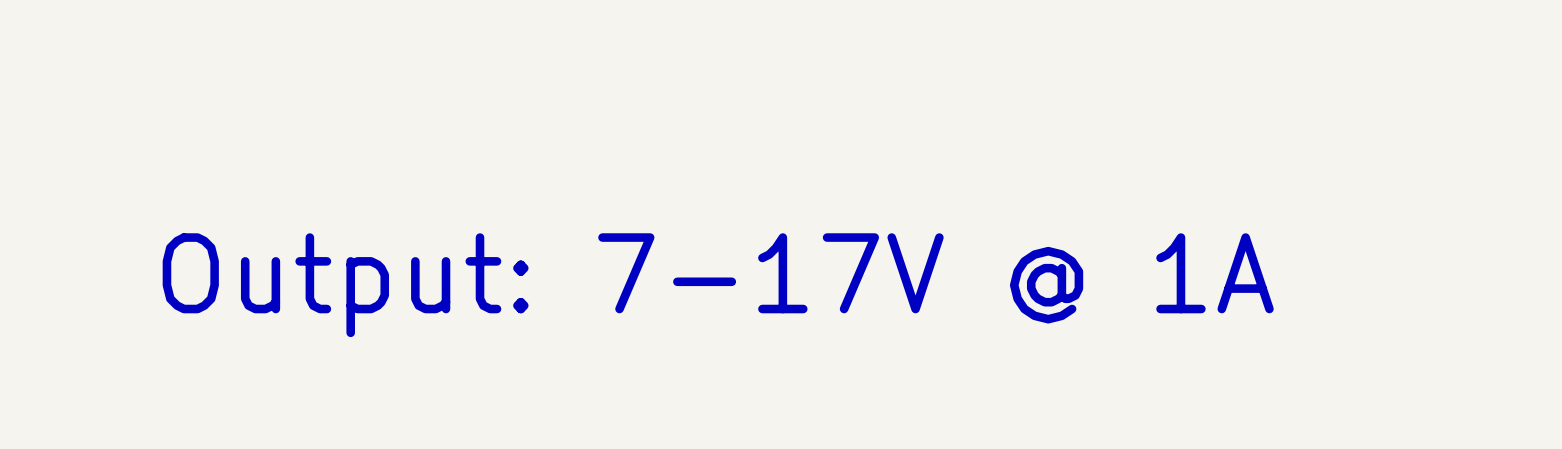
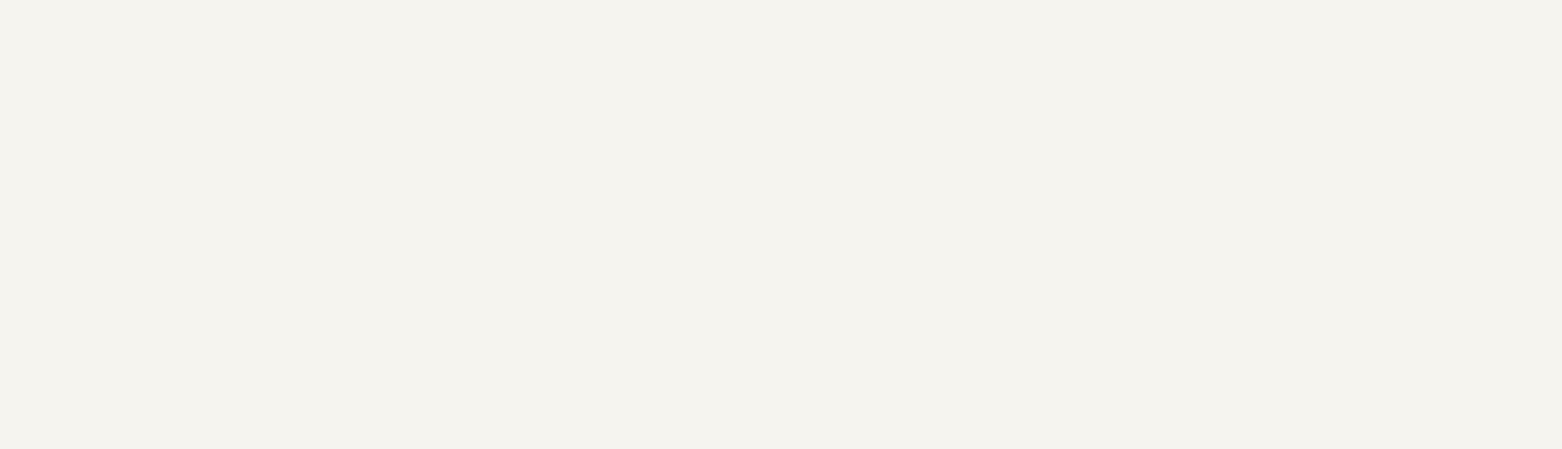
text: Output: 7-17V @ 1A (718, 285) -> none

